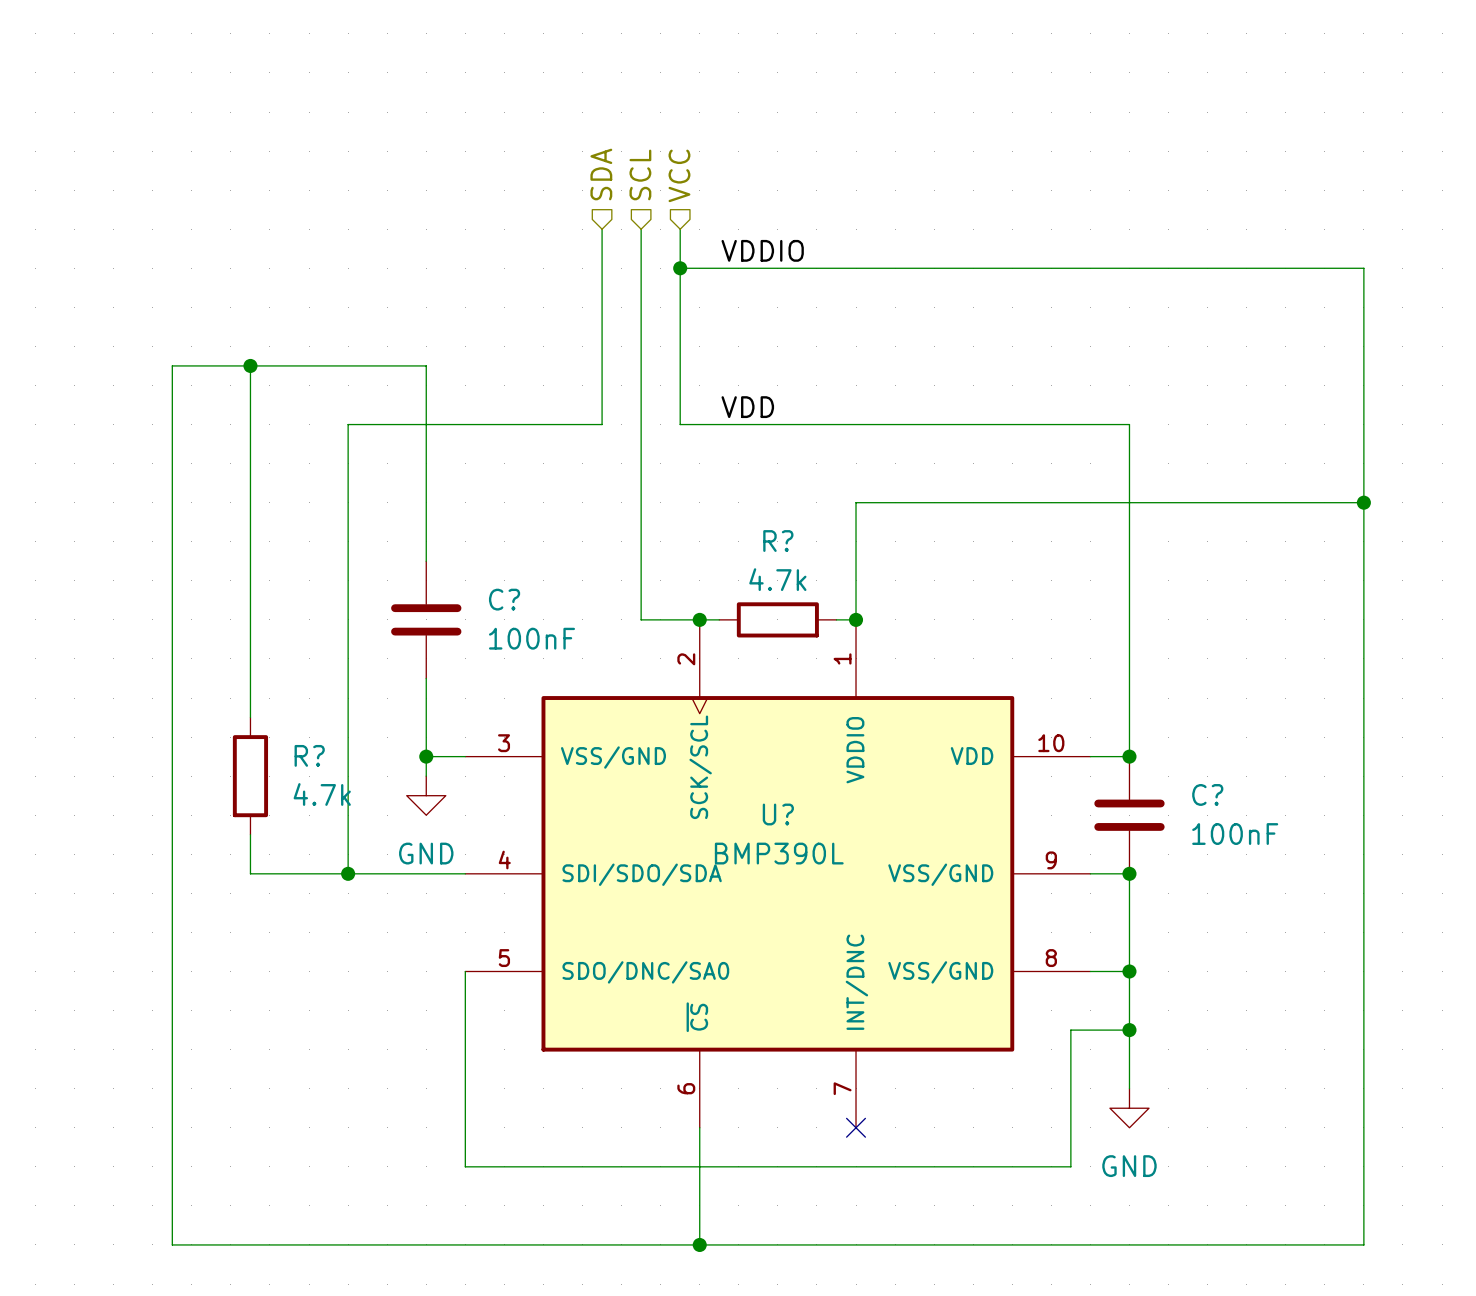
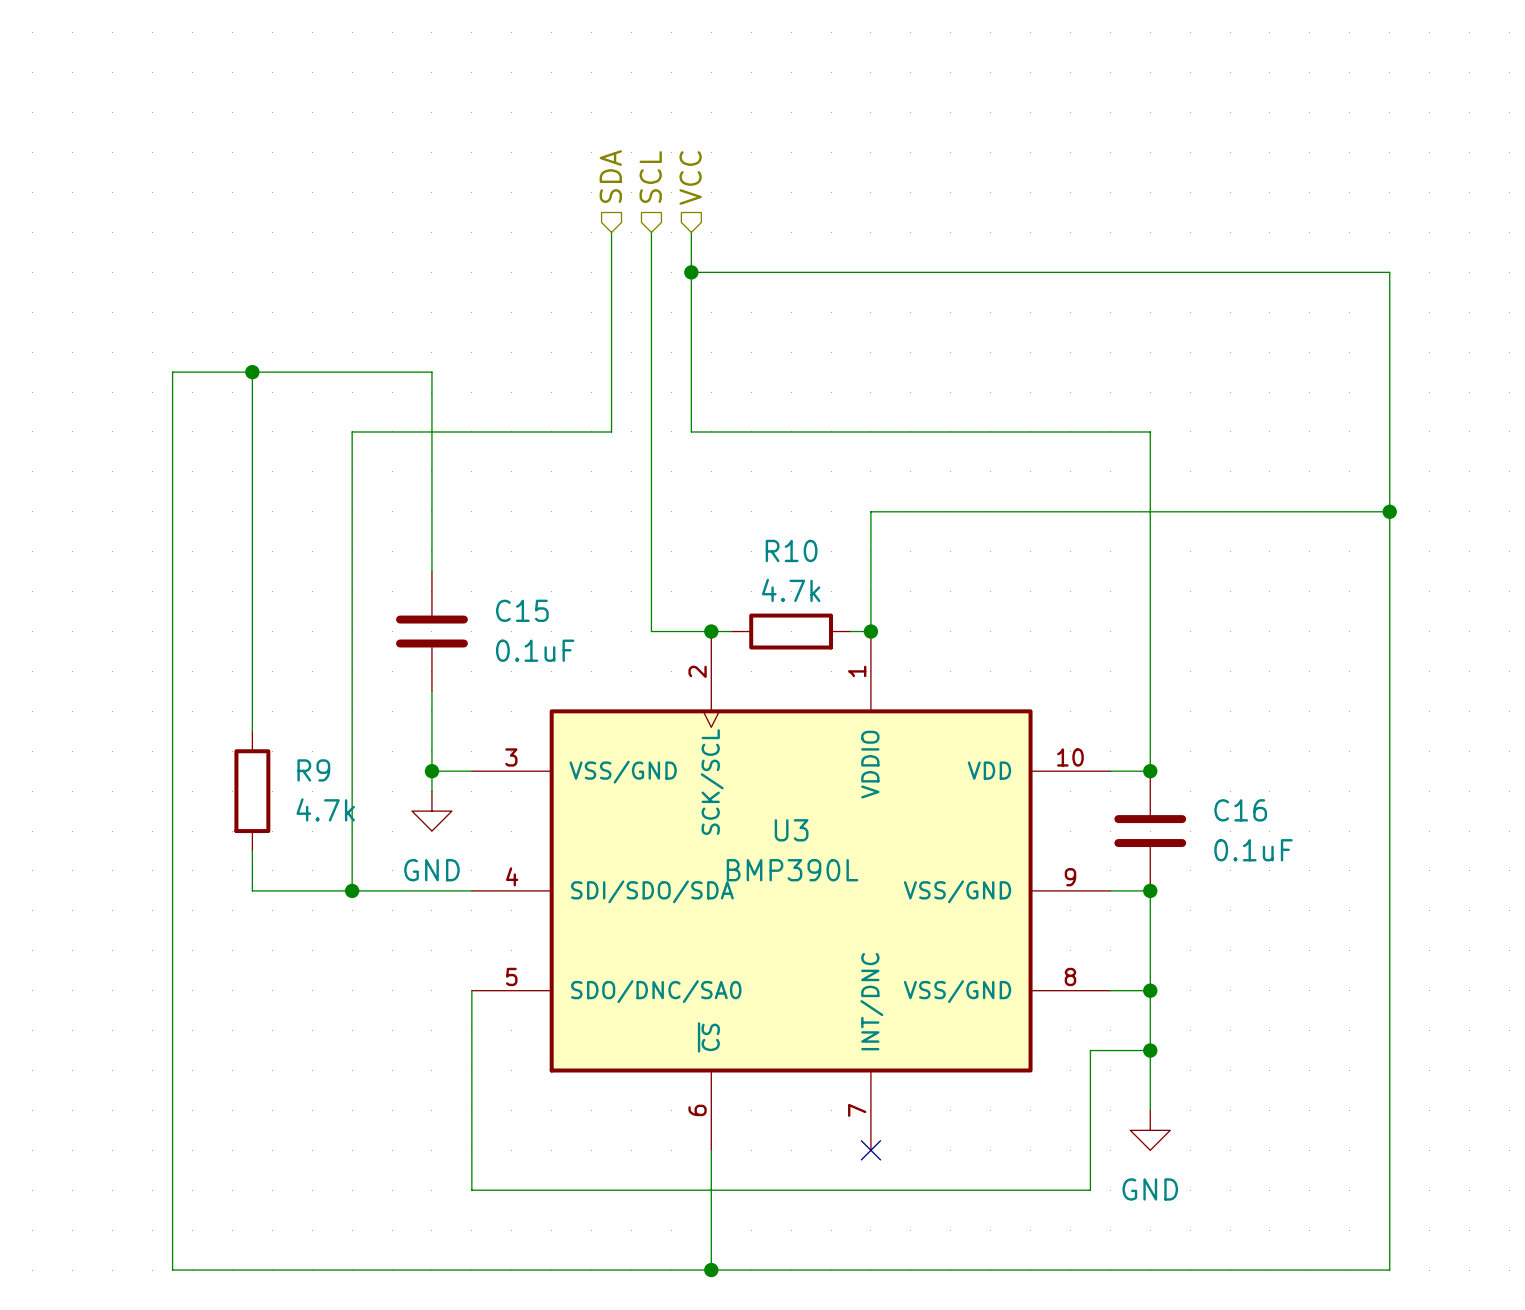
label: VDDIO (762, 250) -> none
label: VDD (747, 407) -> none
R? name: R? (778, 541) -> R10 (791, 550)
C? name: C? (504, 599) -> C15 (522, 610)
C? value: 100nF (531, 638) -> 0.1uF (535, 650)
R? name: R? (309, 755) -> R9 (313, 770)
C? name: C? (1207, 794) -> C16 (1240, 810)
U? name: U? (778, 814) -> U3 (791, 830)
C? value: 100nF (1235, 834) -> 0.1uF (1253, 850)

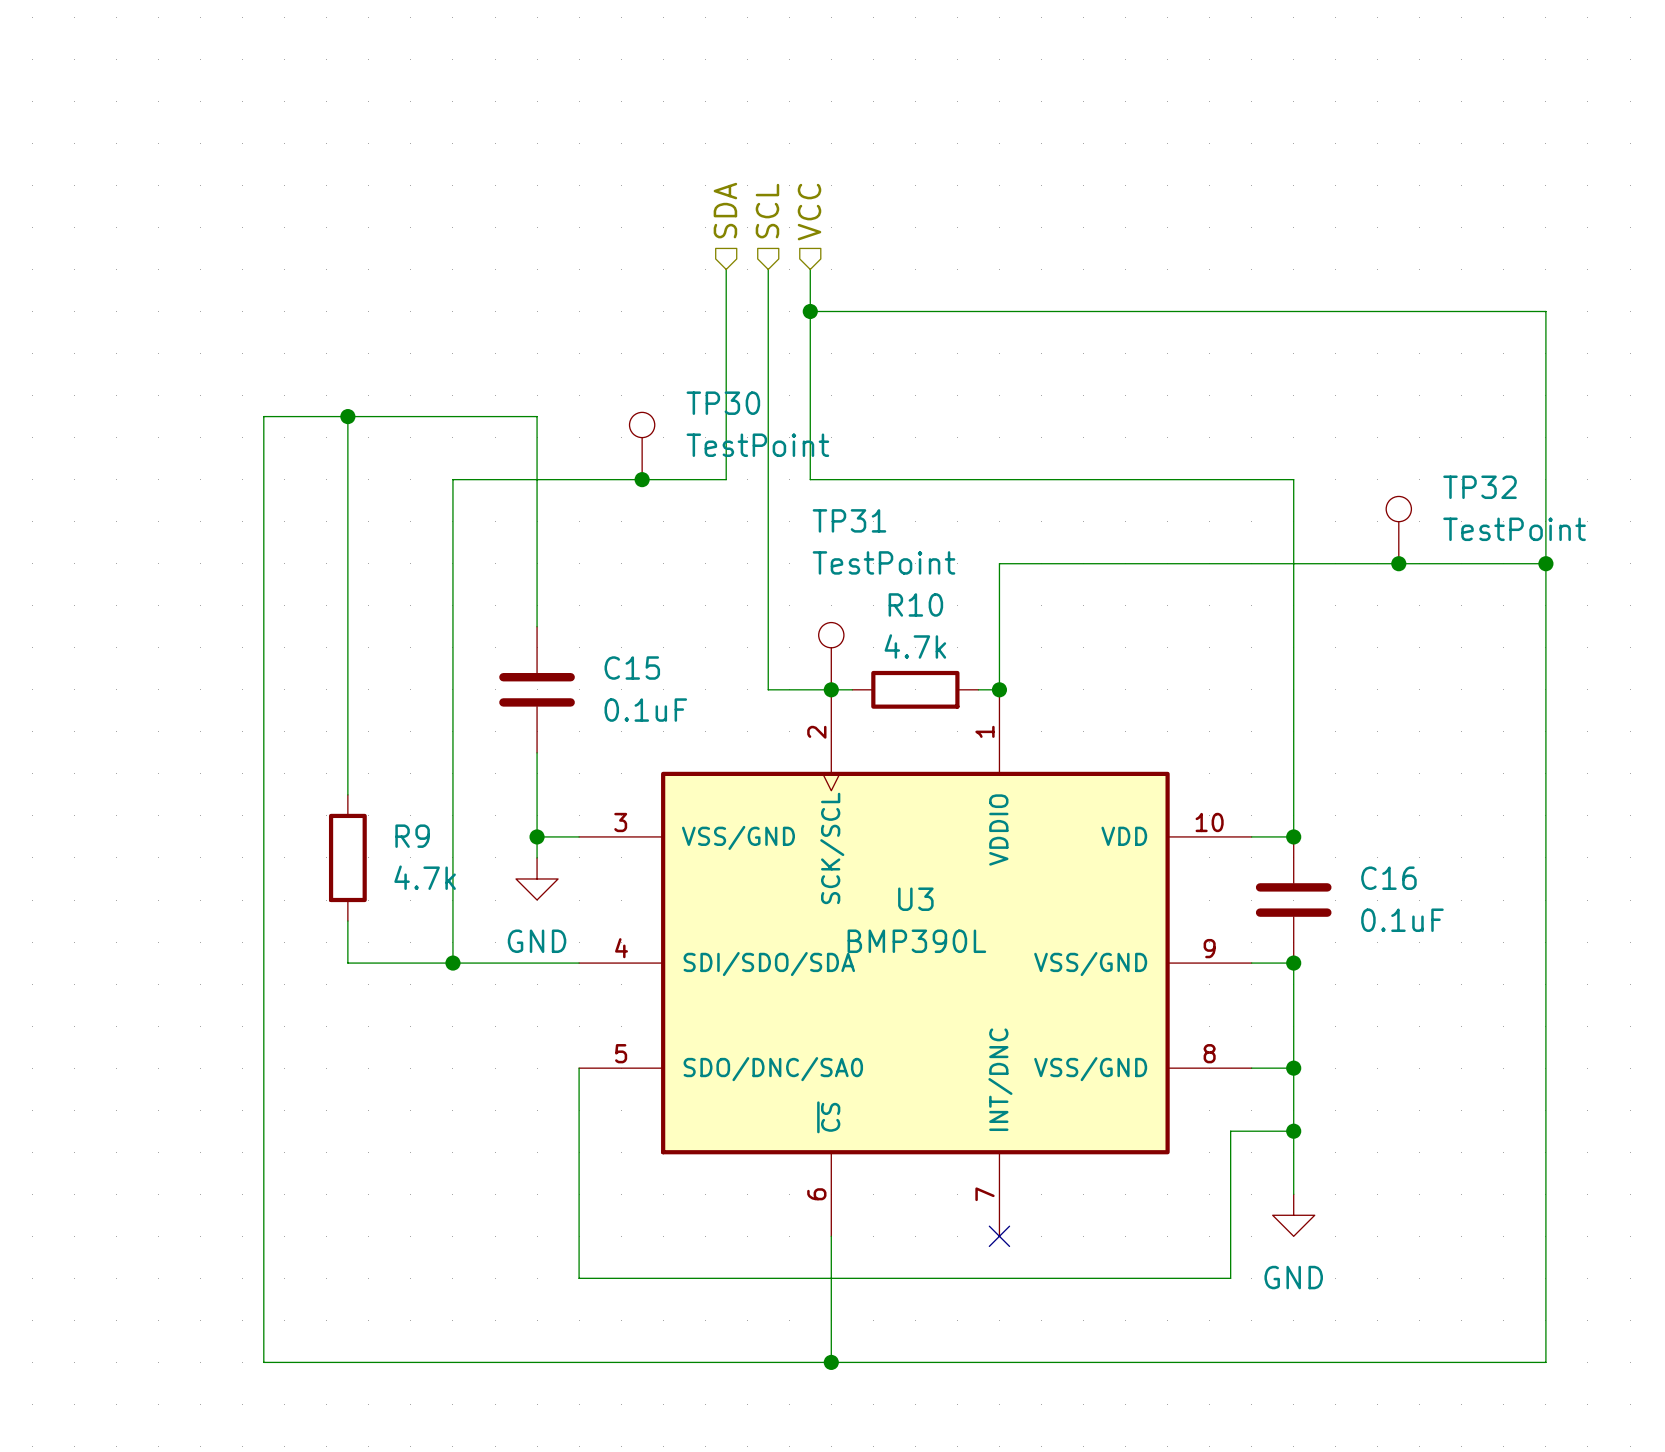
TP30: none -> TestPoint (642, 446)
junction: none -> (642, 479)
TP32: none -> TestPoint (1398, 530)
junction: none -> (1398, 563)
TP31: none -> TestPoint (831, 656)

